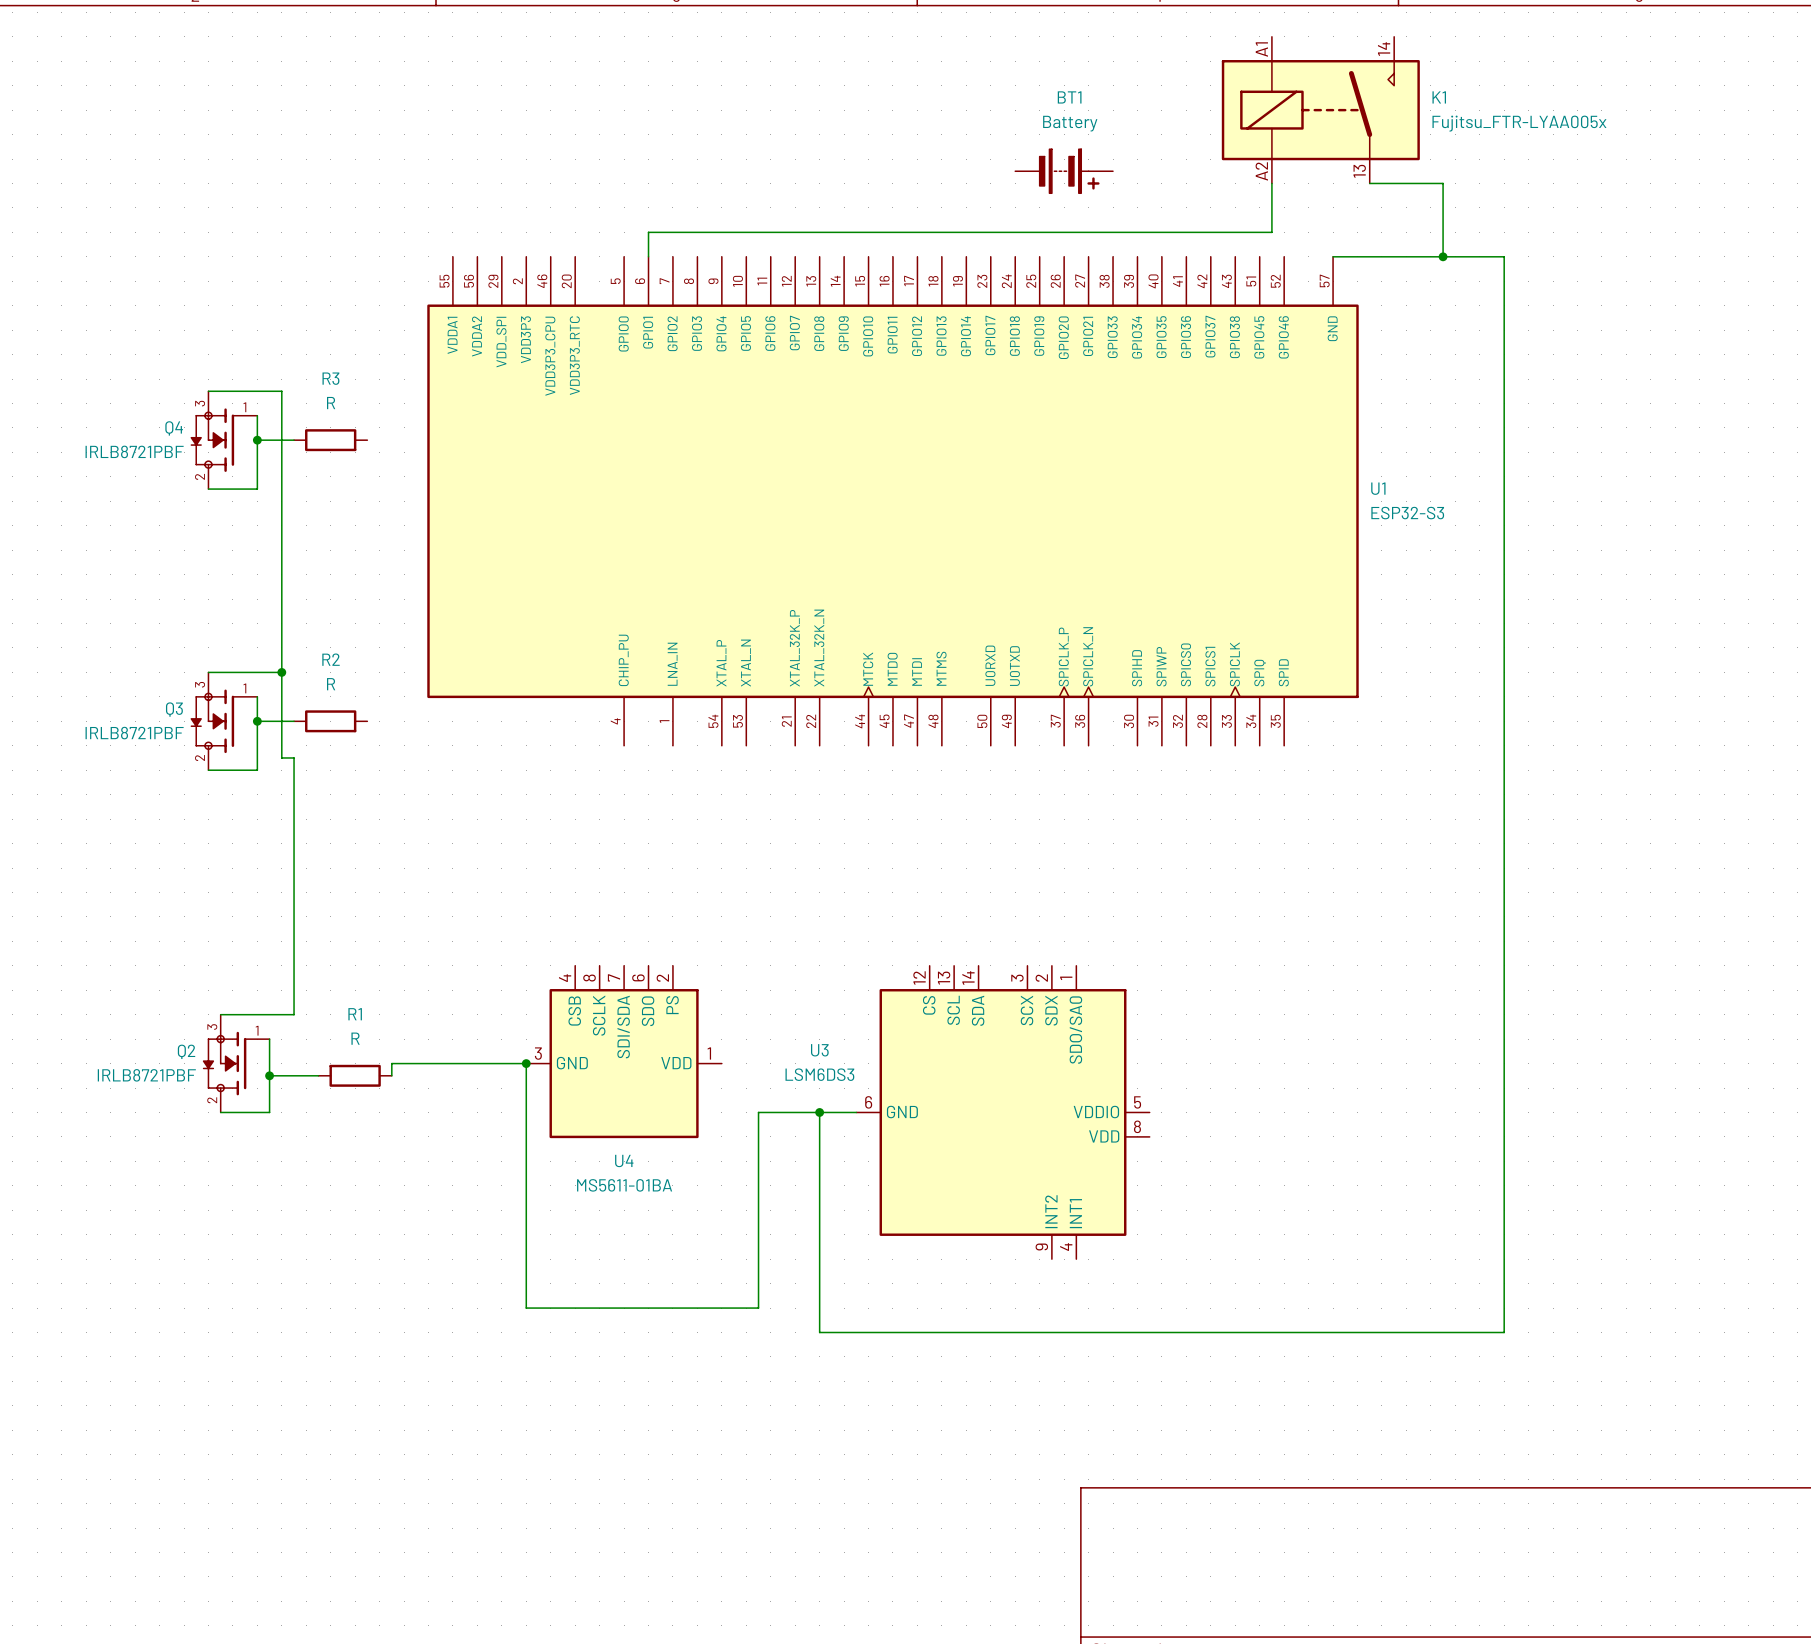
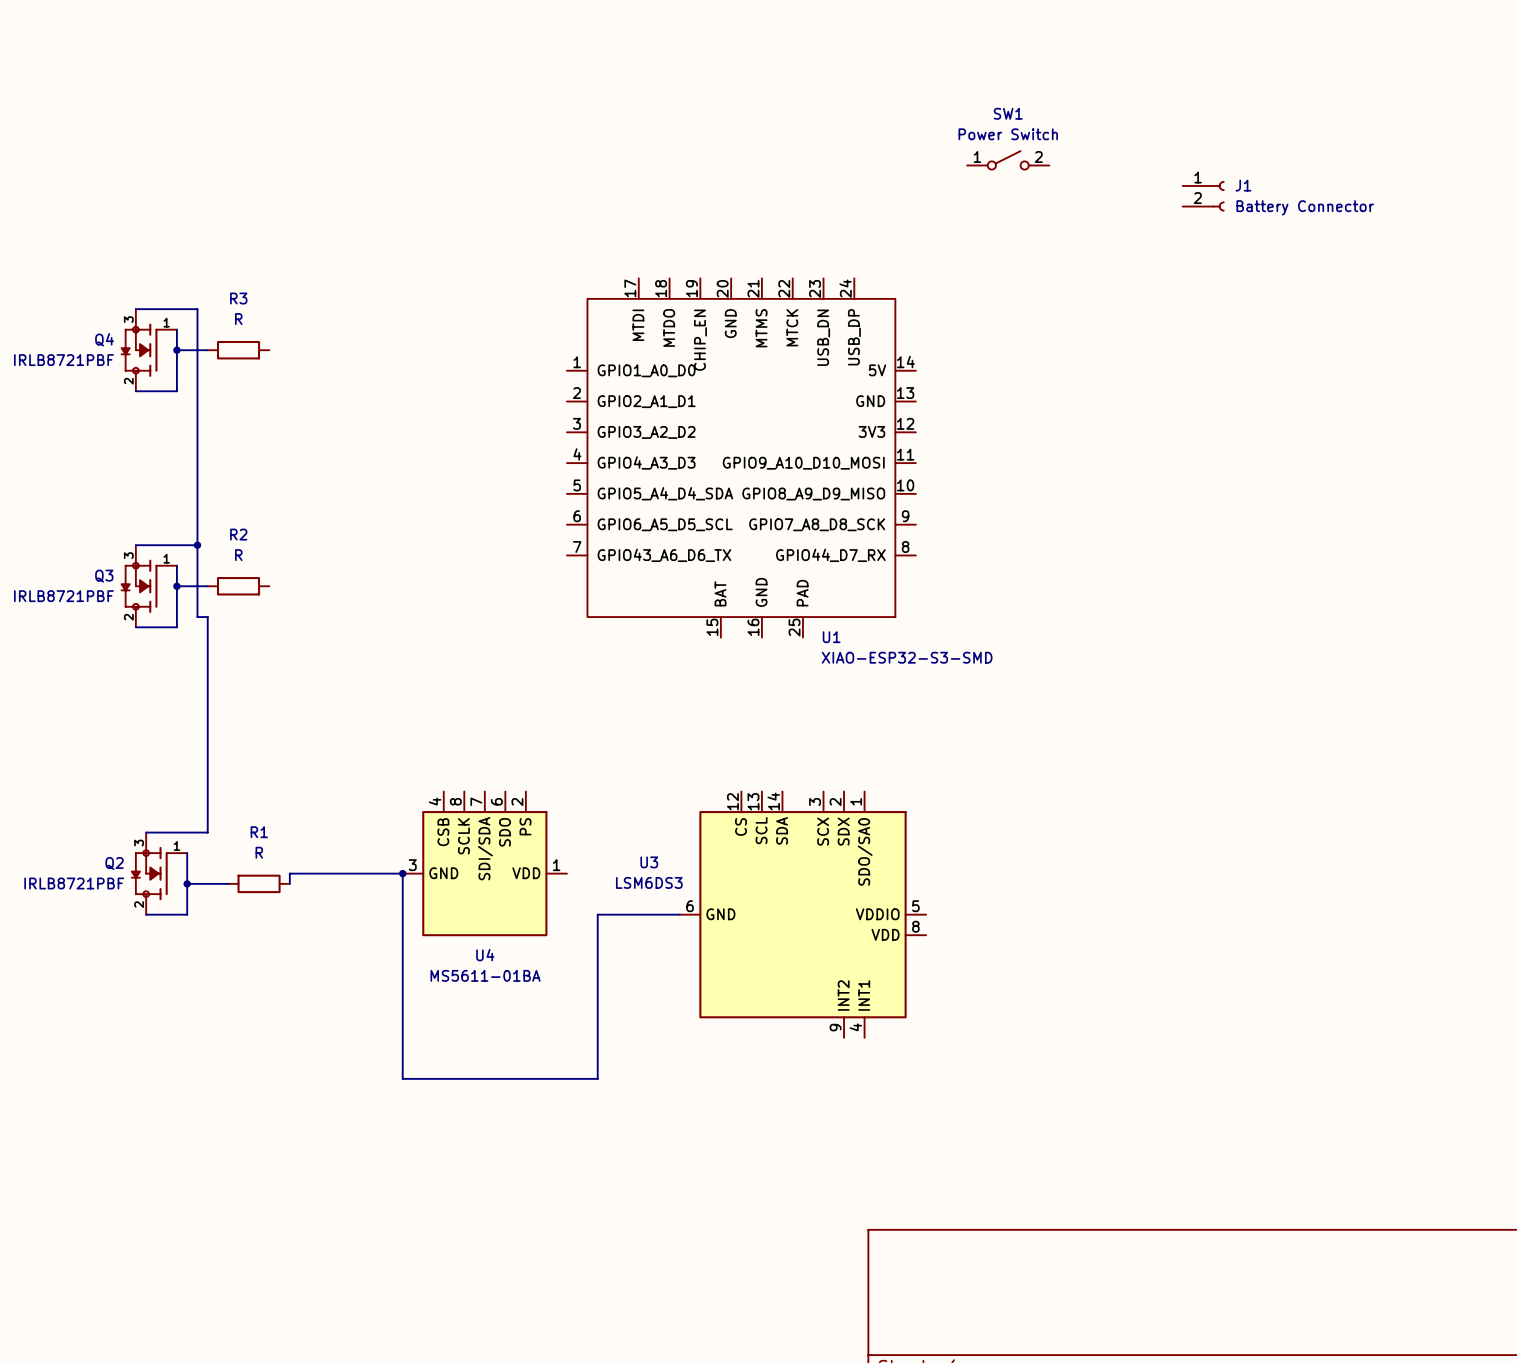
K1: Fujitsu_FTR-LYAA005x (1320, 110) -> none
BT1: Battery (1064, 171) -> none
wire: (1271, 183) (1271, 232) (648, 232) (648, 256) -> none
wire: (1369, 183) (1443, 183) (1443, 256) -> none
SW1: none -> Power Switch (1008, 160)
U1 symbol: [427, 256, 1359, 746] -> [566, 278, 916, 638]
wire: (1333, 256) (1504, 256) (1504, 1332) (819, 1332) (819, 1112) -> none
junction: (1443, 256) -> none
J1: none -> Battery Connector (1203, 196)
U1 name position: U1 (1378, 488) -> U1 (831, 637)
U1 value: ESP32-S3 (1407, 513) -> XIAO-ESP32-S3-SMD (907, 657)
junction: (819, 1112) -> none

